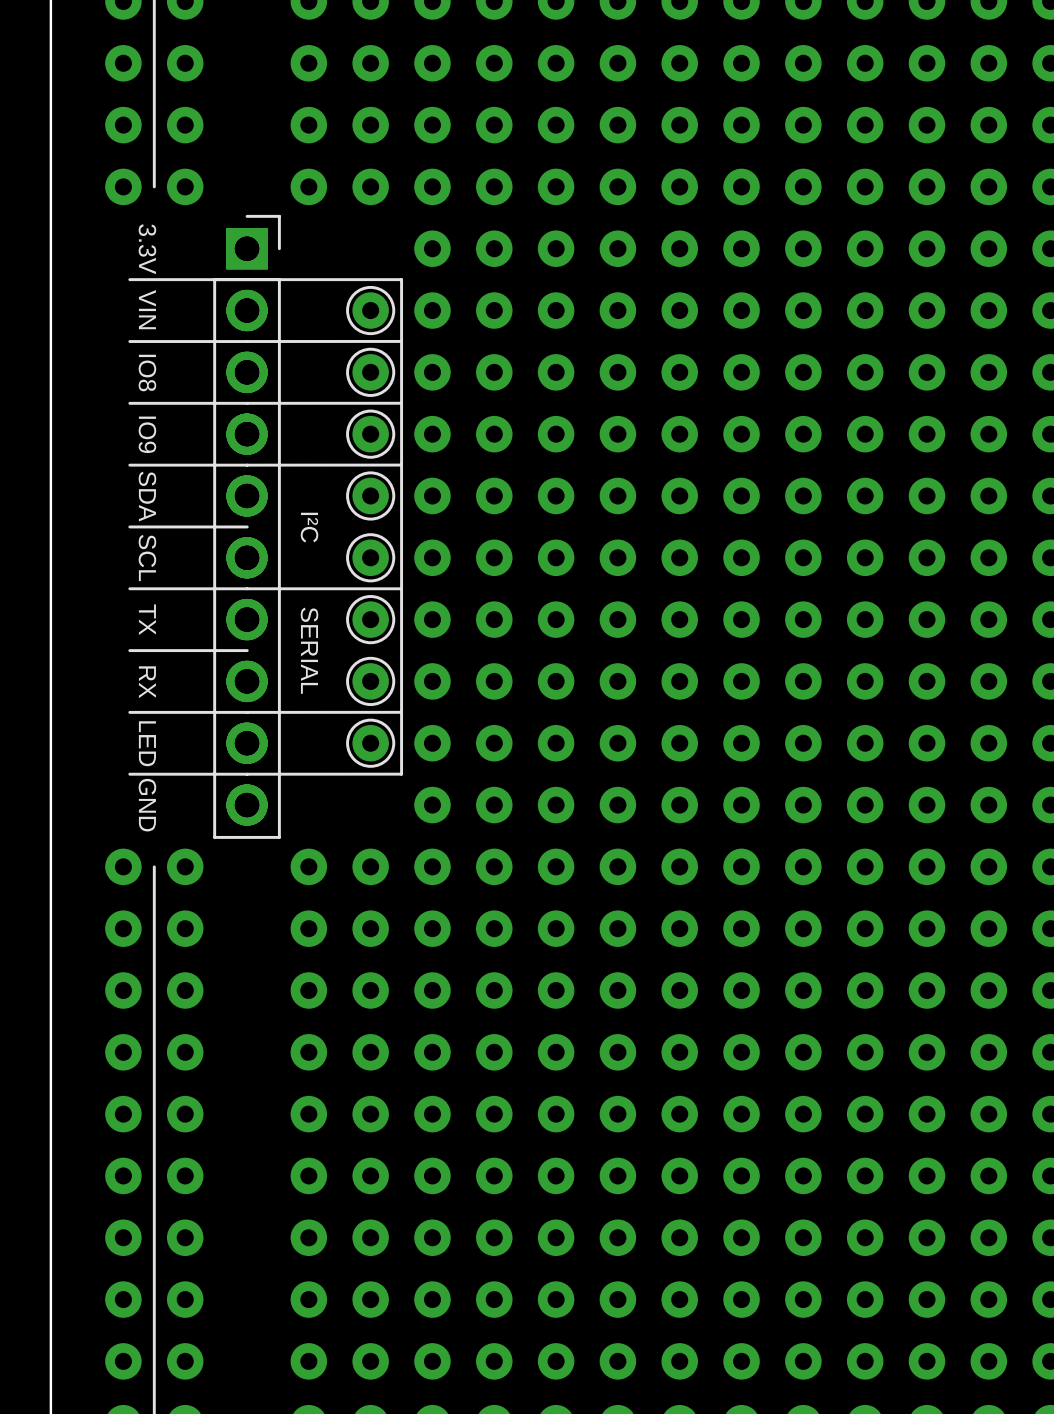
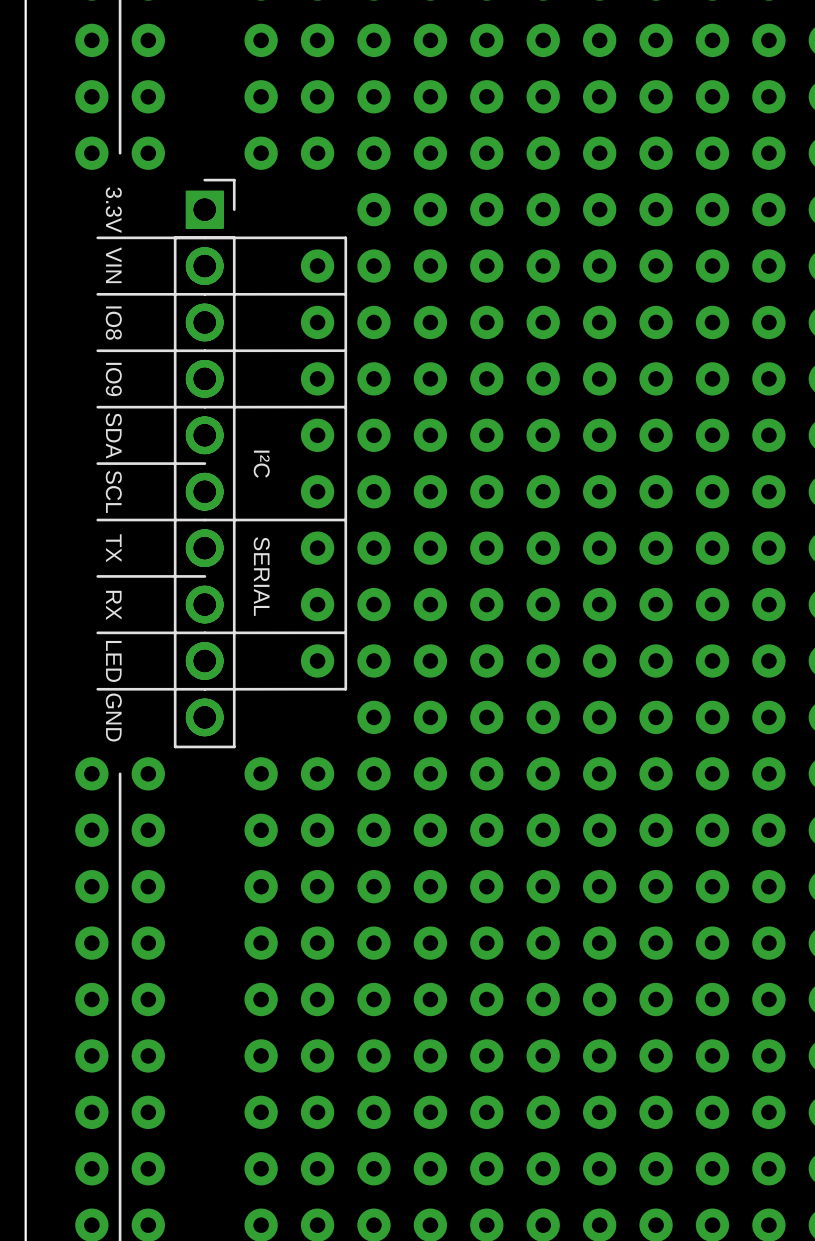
part footprint: [346, 285, 396, 336] -> [300, 249, 335, 283]
part footprint: [346, 347, 396, 397] -> [300, 305, 335, 340]
part footprint: [346, 409, 396, 459] -> [300, 362, 335, 396]
part footprint: [346, 471, 396, 521] -> [300, 418, 335, 452]
part footprint: [346, 533, 396, 583] -> [300, 475, 335, 509]
part footprint: [346, 595, 396, 645] -> [300, 531, 335, 565]
part footprint: [346, 656, 396, 707] -> [300, 587, 335, 622]
part footprint: [346, 718, 396, 768] -> [300, 644, 335, 678]

